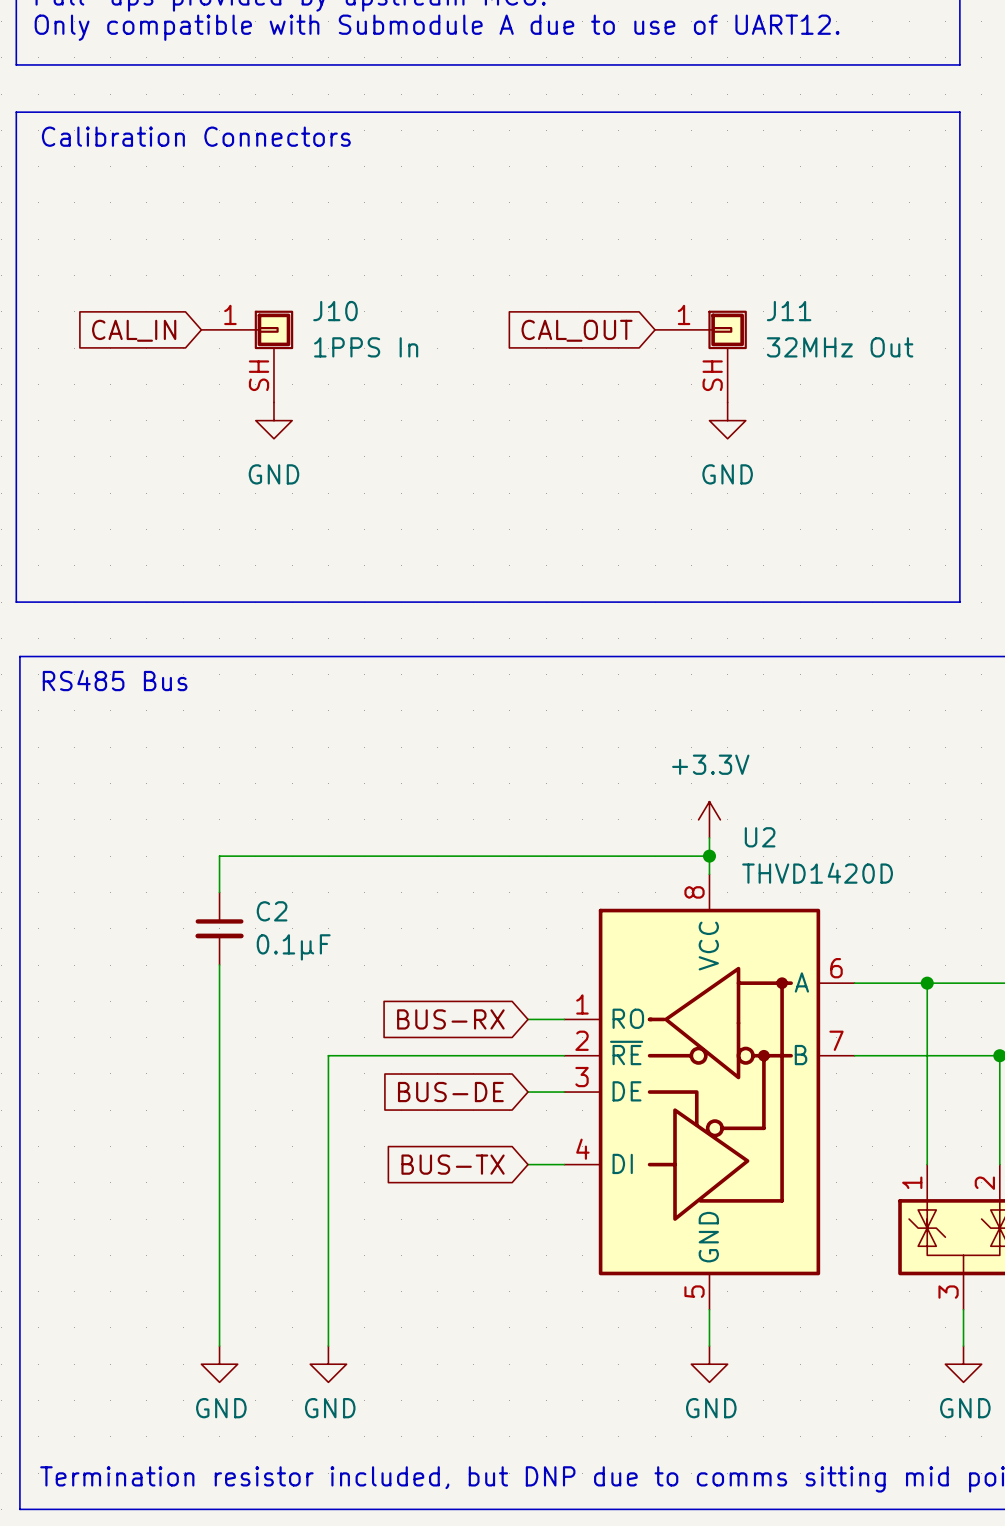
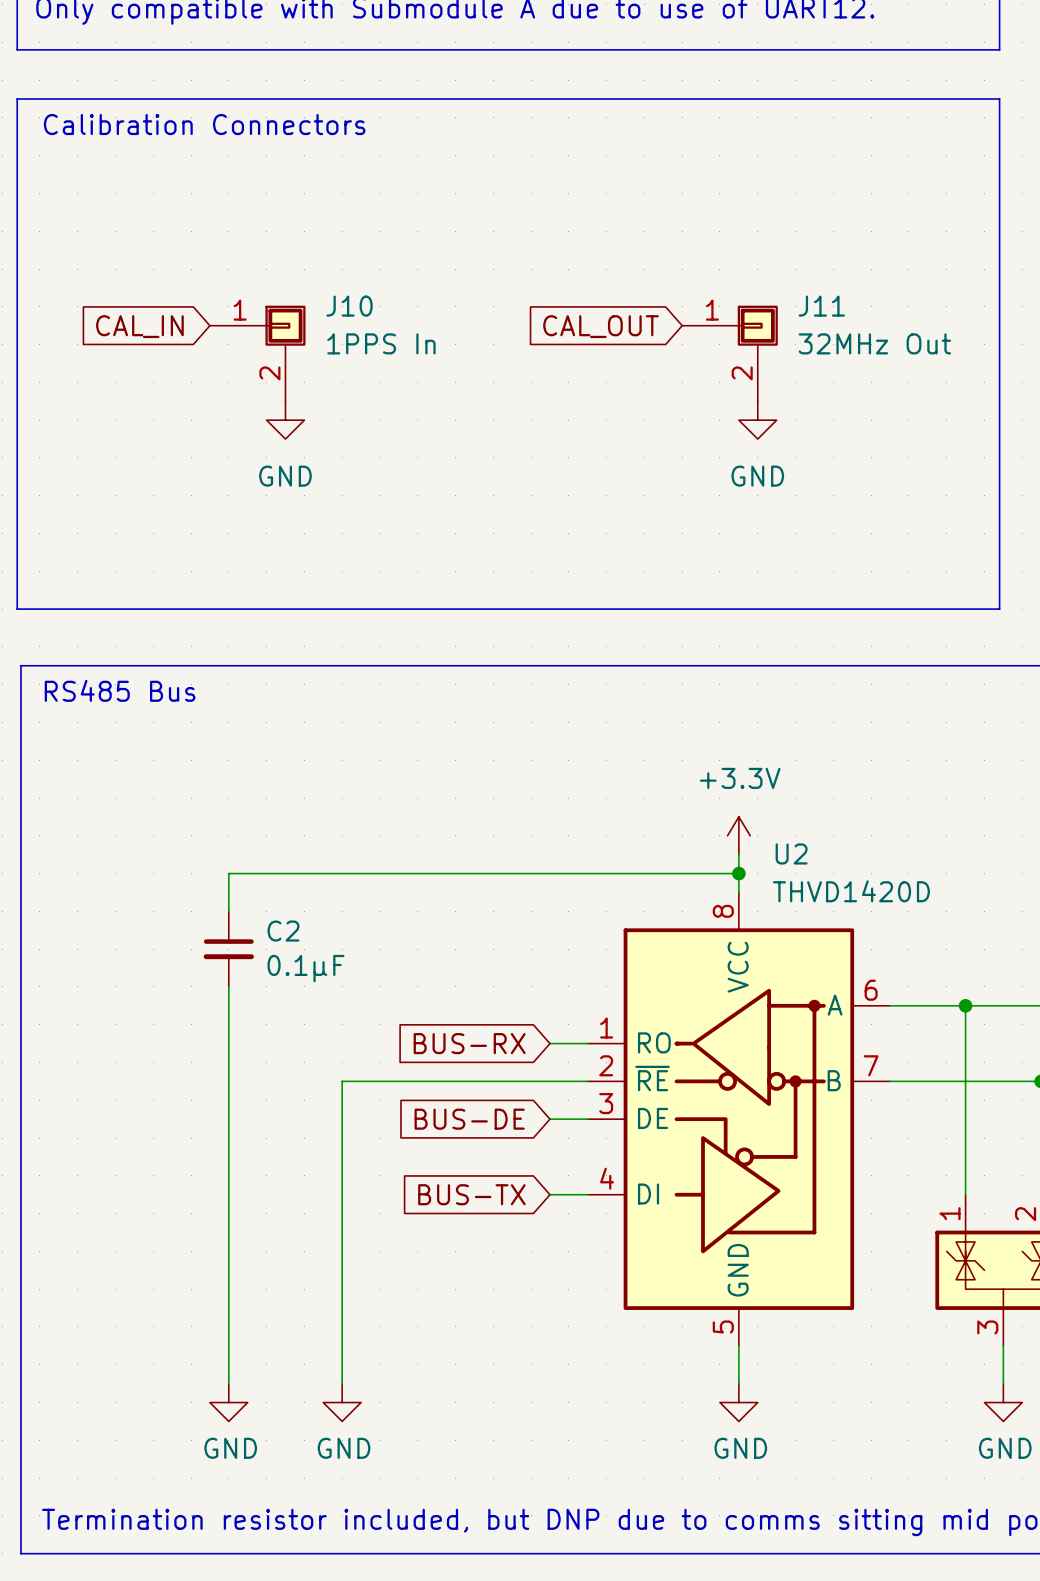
J10 pin number: SH (259, 375) -> 2 (269, 373)
J11 pin number: SH (712, 375) -> 2 (742, 373)

